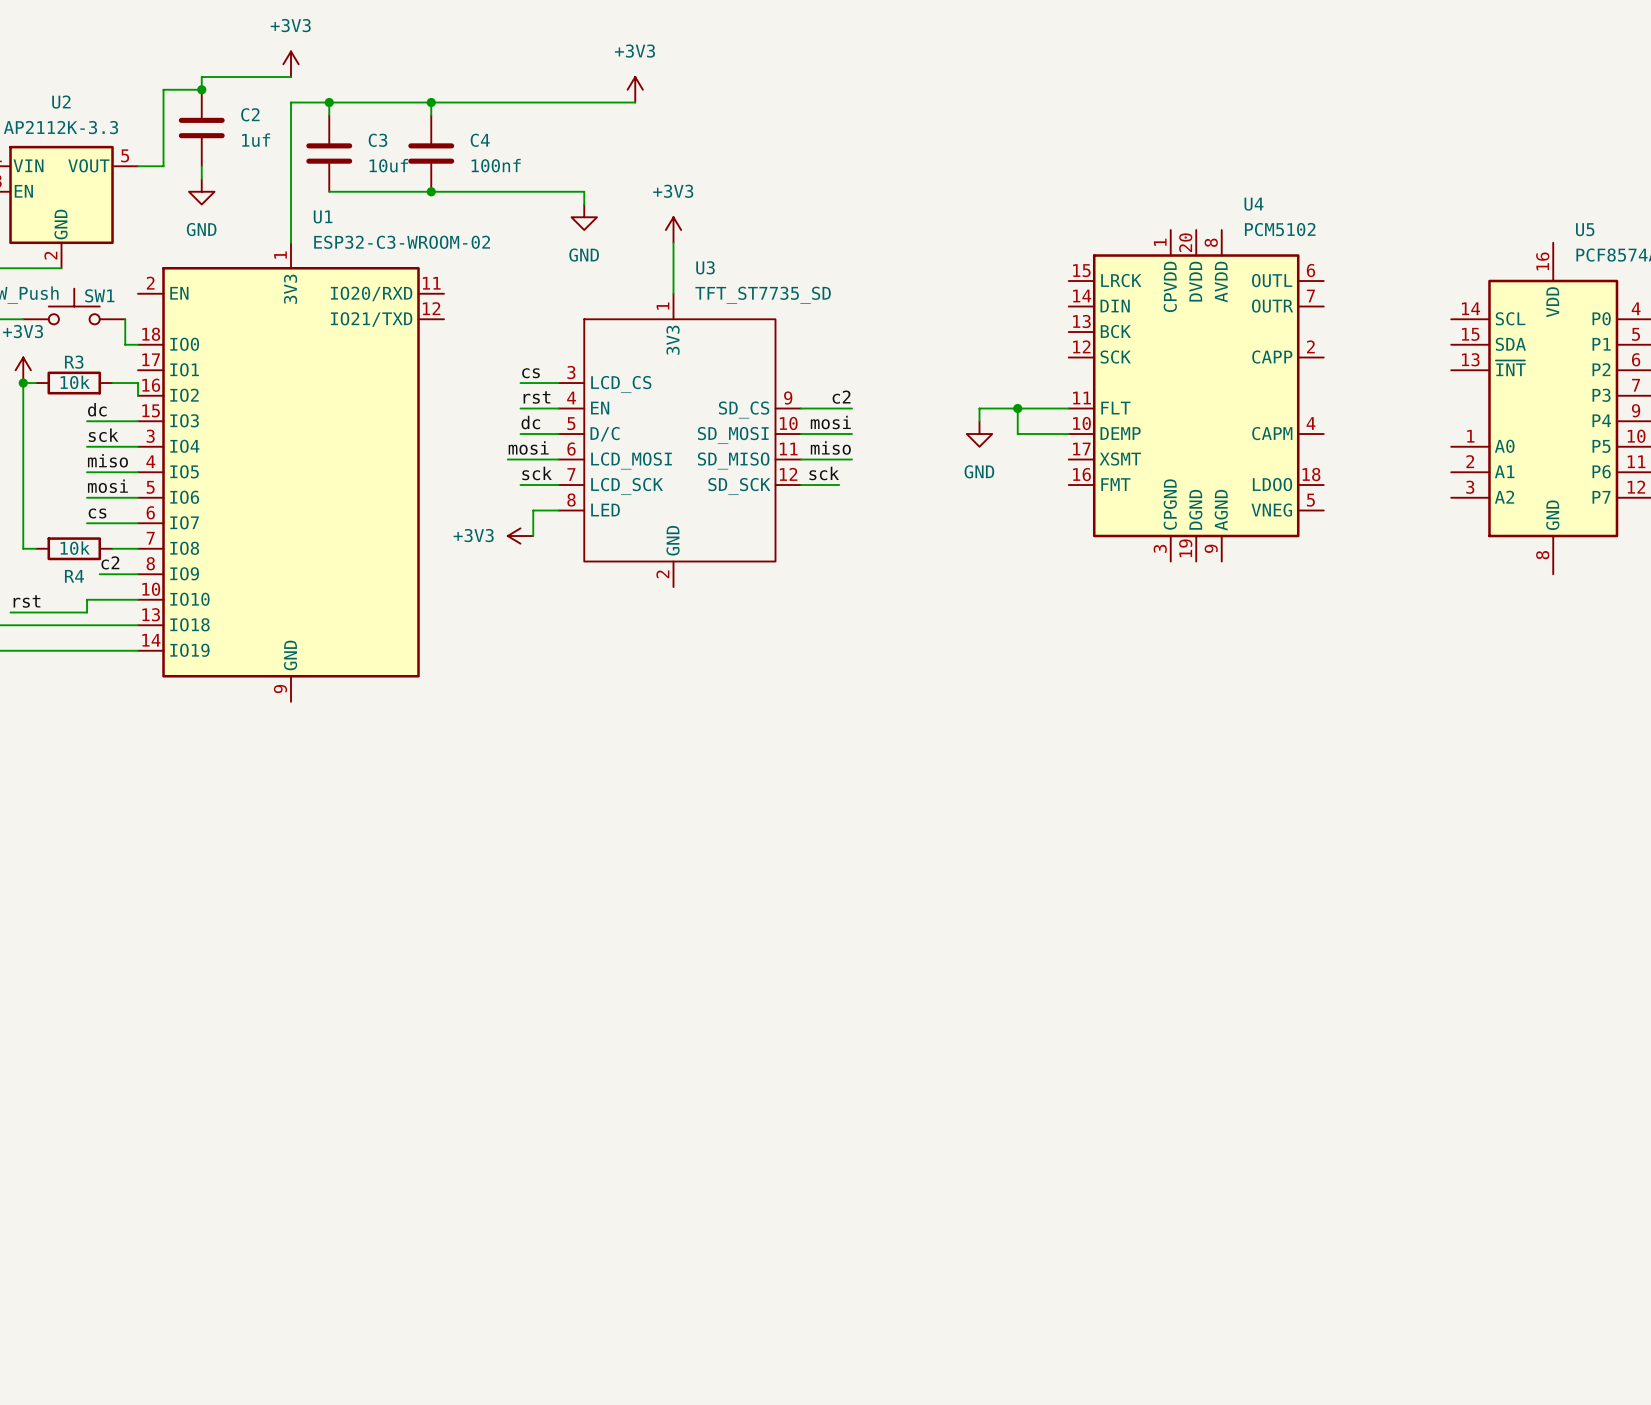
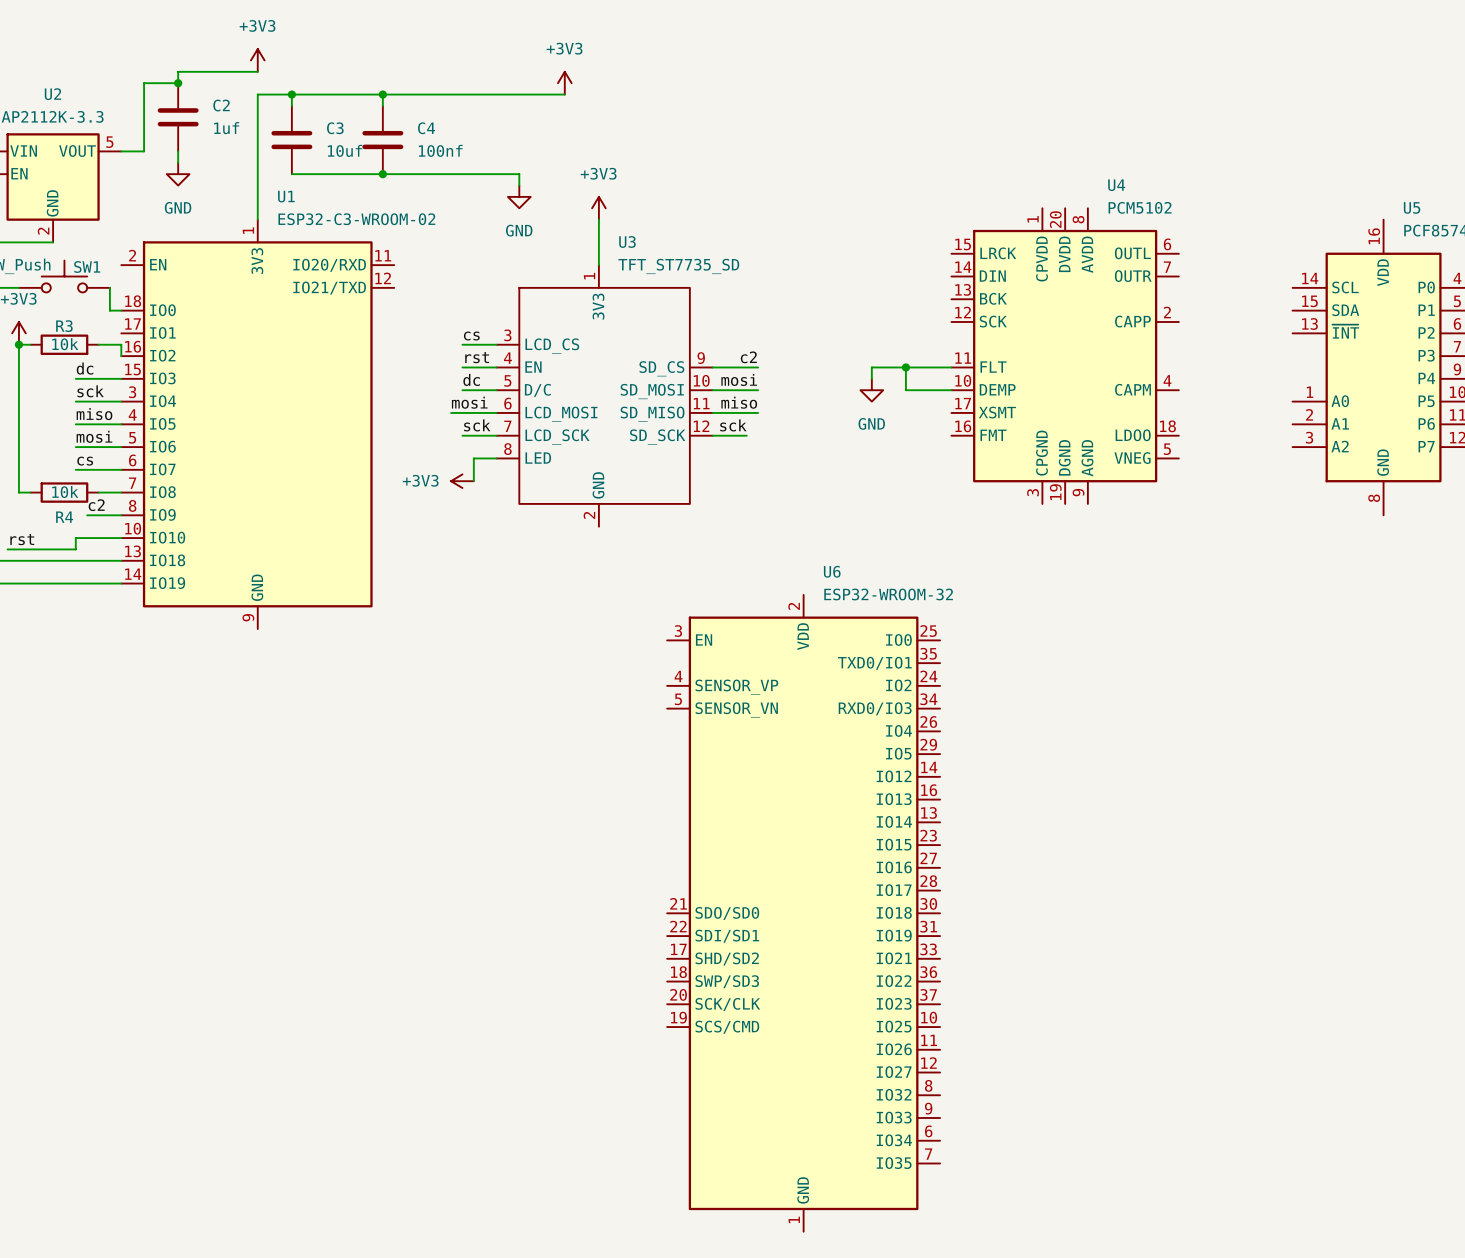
U6: none -> ESP32-WROOM-32 (803, 913)

